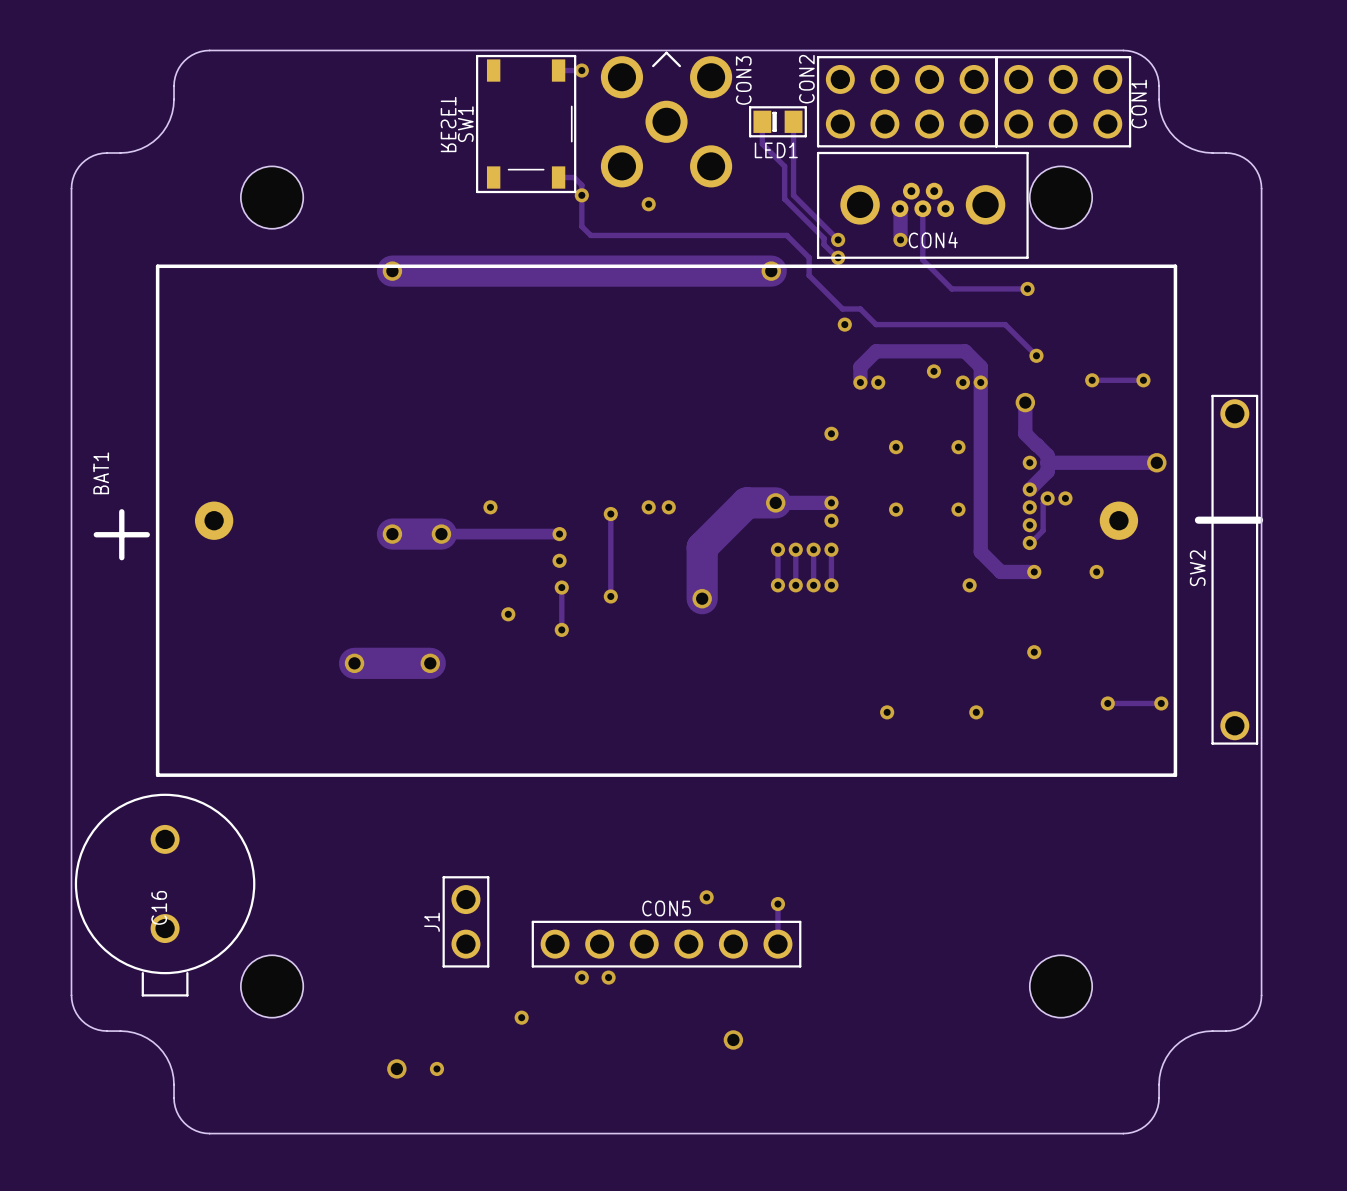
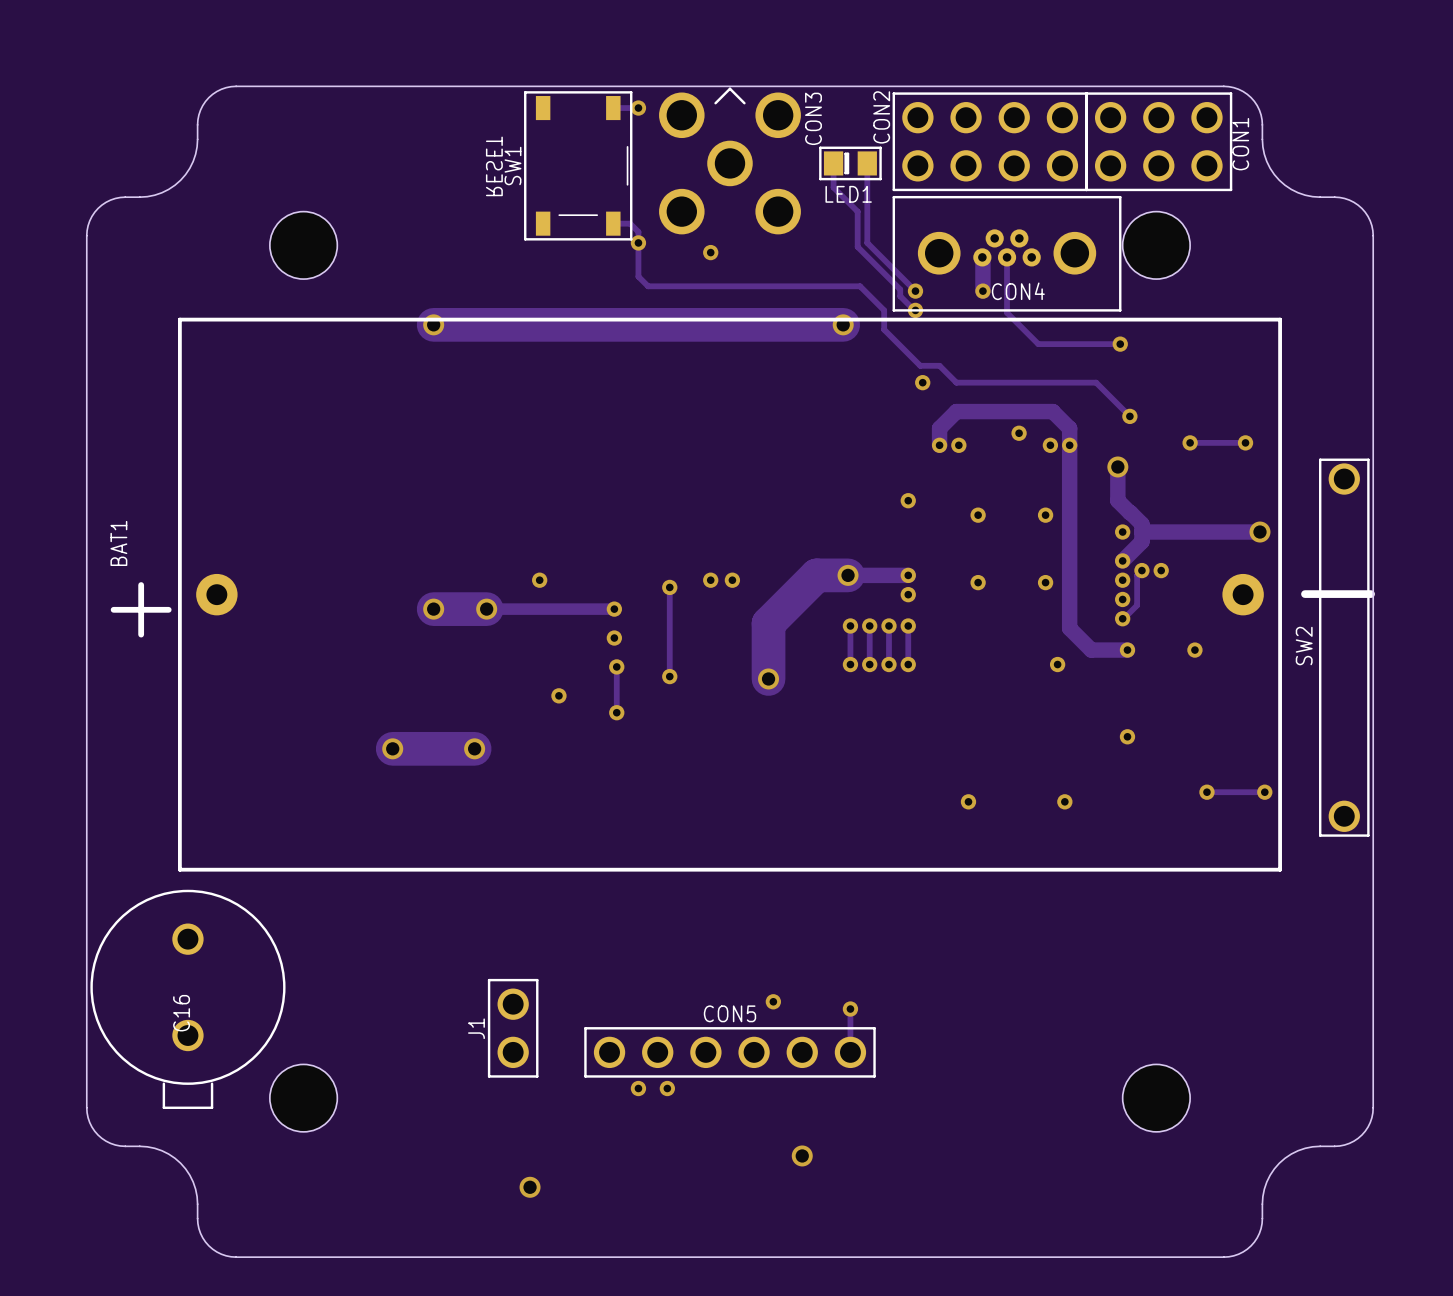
BAT1 footprint: [155, 264, 1178, 777] -> [178, 317, 1282, 872]
via: (521, 1017) -> none
via position: (396, 1068) -> (530, 1187)
via: (436, 1068) -> none

